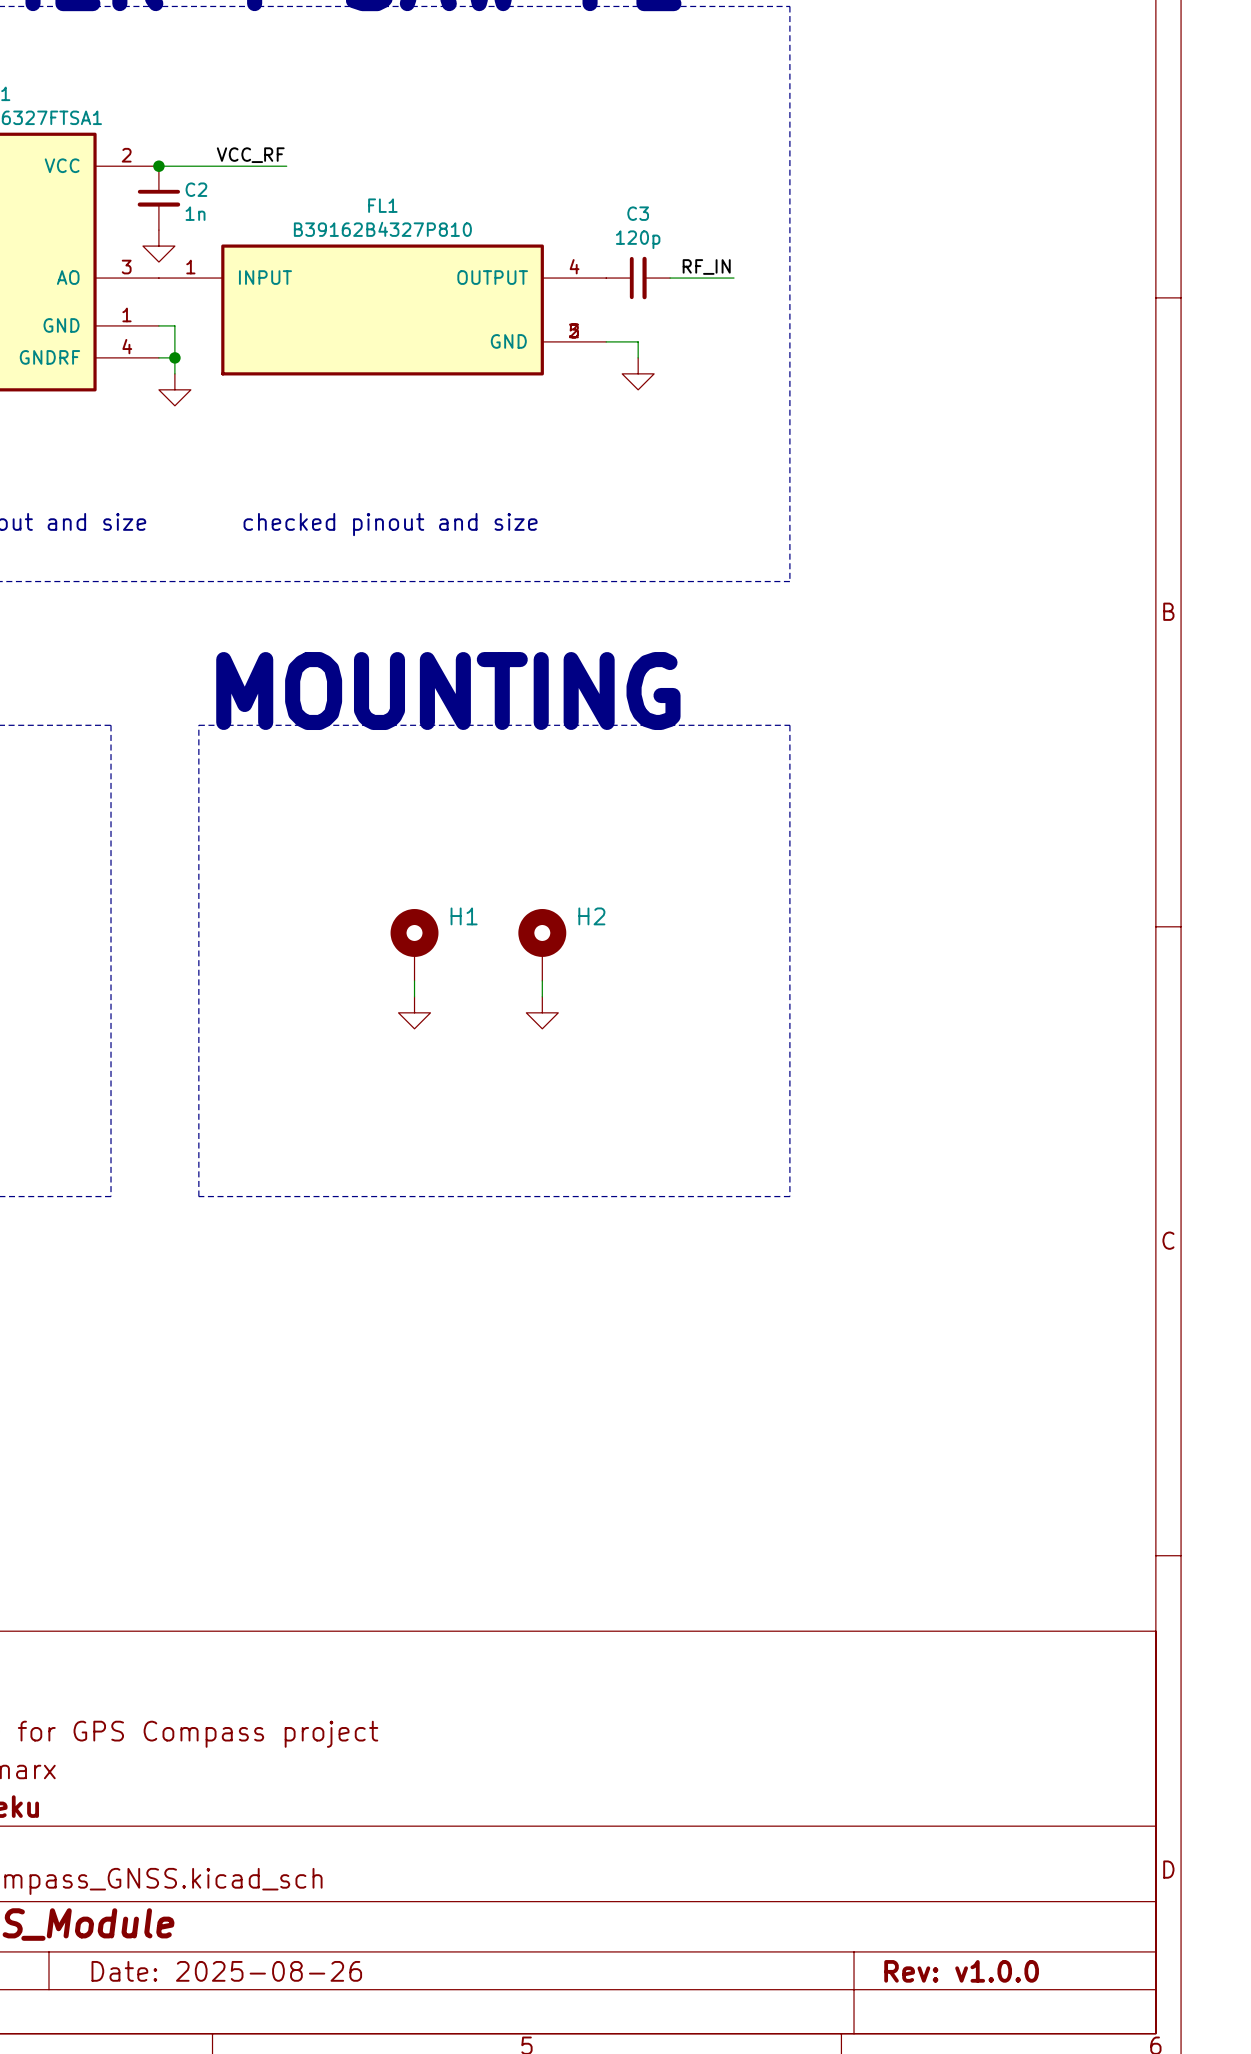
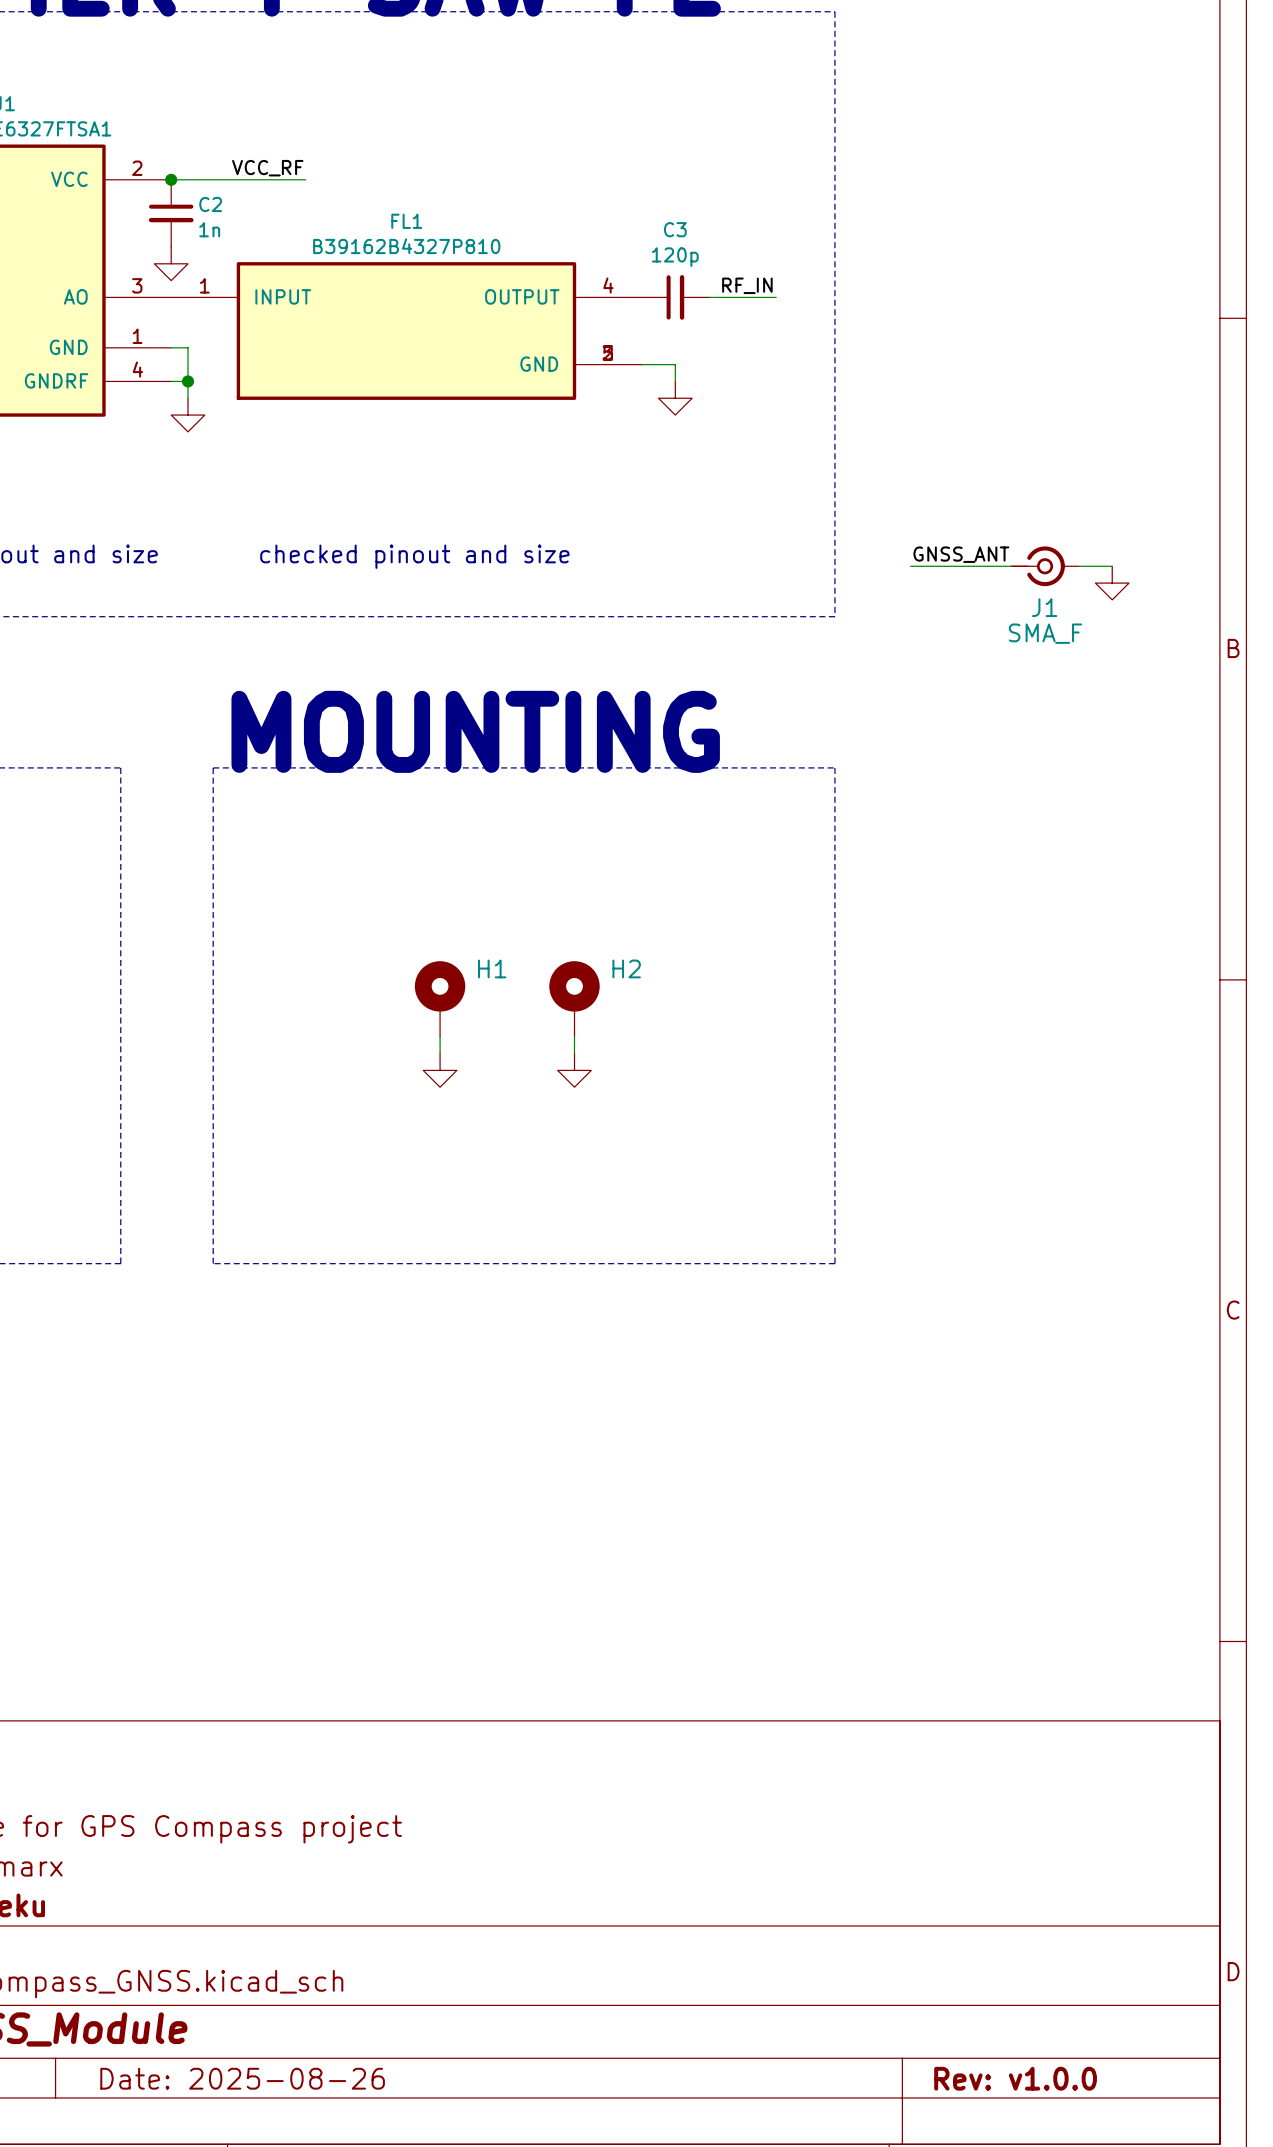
label: none -> GNSS_ANT (961, 554)
wire: none -> (910, 566) (1011, 566)
J1: none -> SMA_F (1045, 566)
wire: none -> (1078, 566) (1112, 566)
power symbol: none -> (1112, 583)

